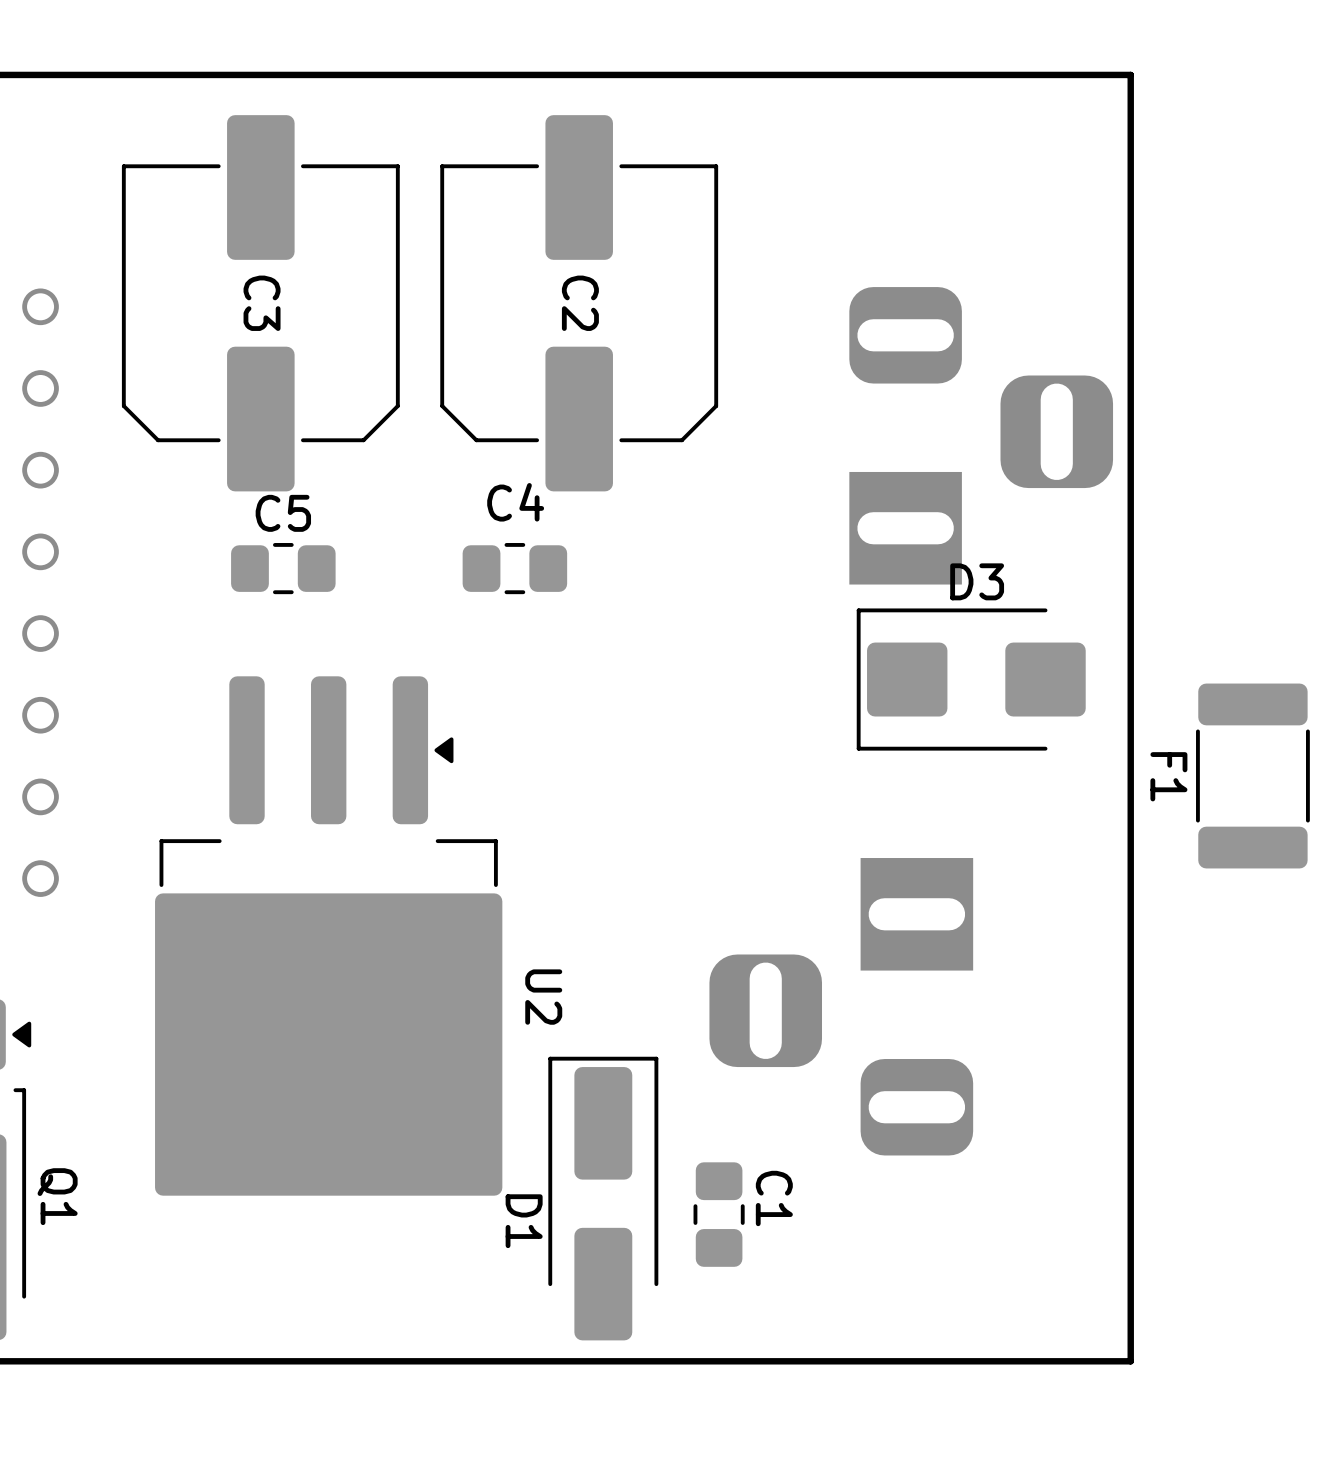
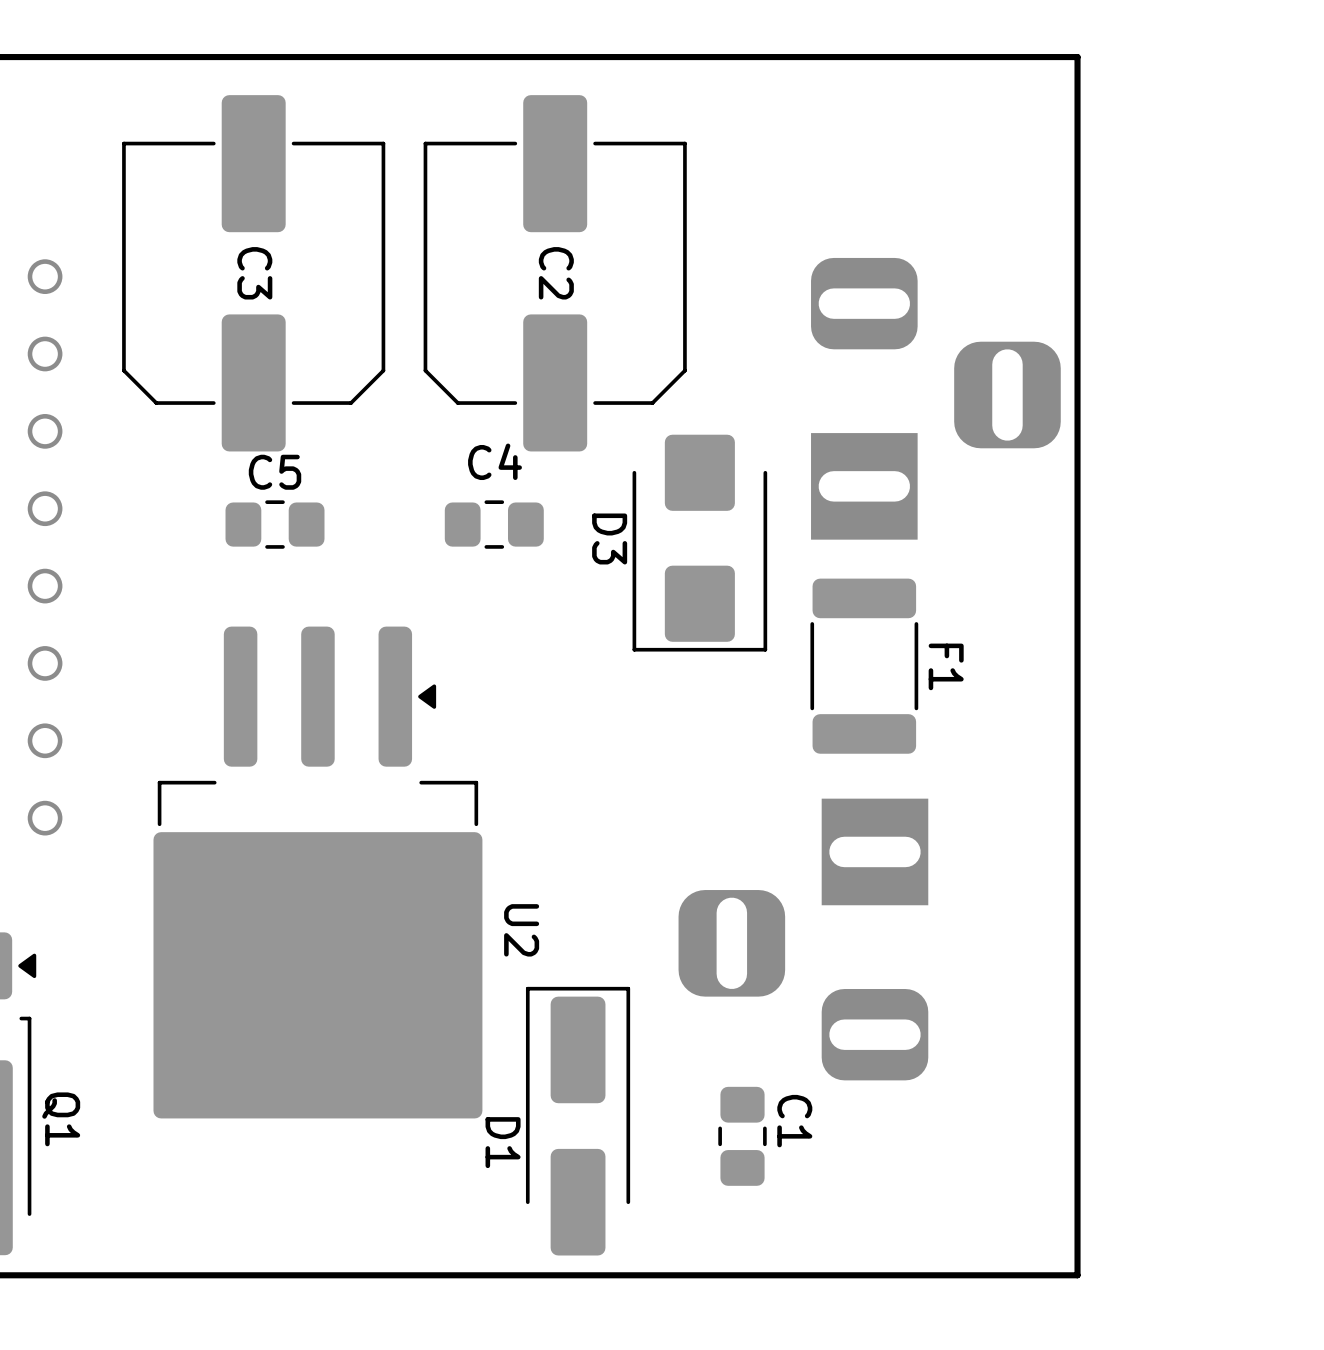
D3 rotation: 0° (971, 679) -> 90° counterclockwise (699, 543)
D3 position: (971, 679) -> (699, 543)
F1 name position: F1 (1168, 776) -> F1 (946, 666)
F1 position: (1252, 776) -> (864, 666)
C1 position: (719, 1214) -> (742, 1136)

